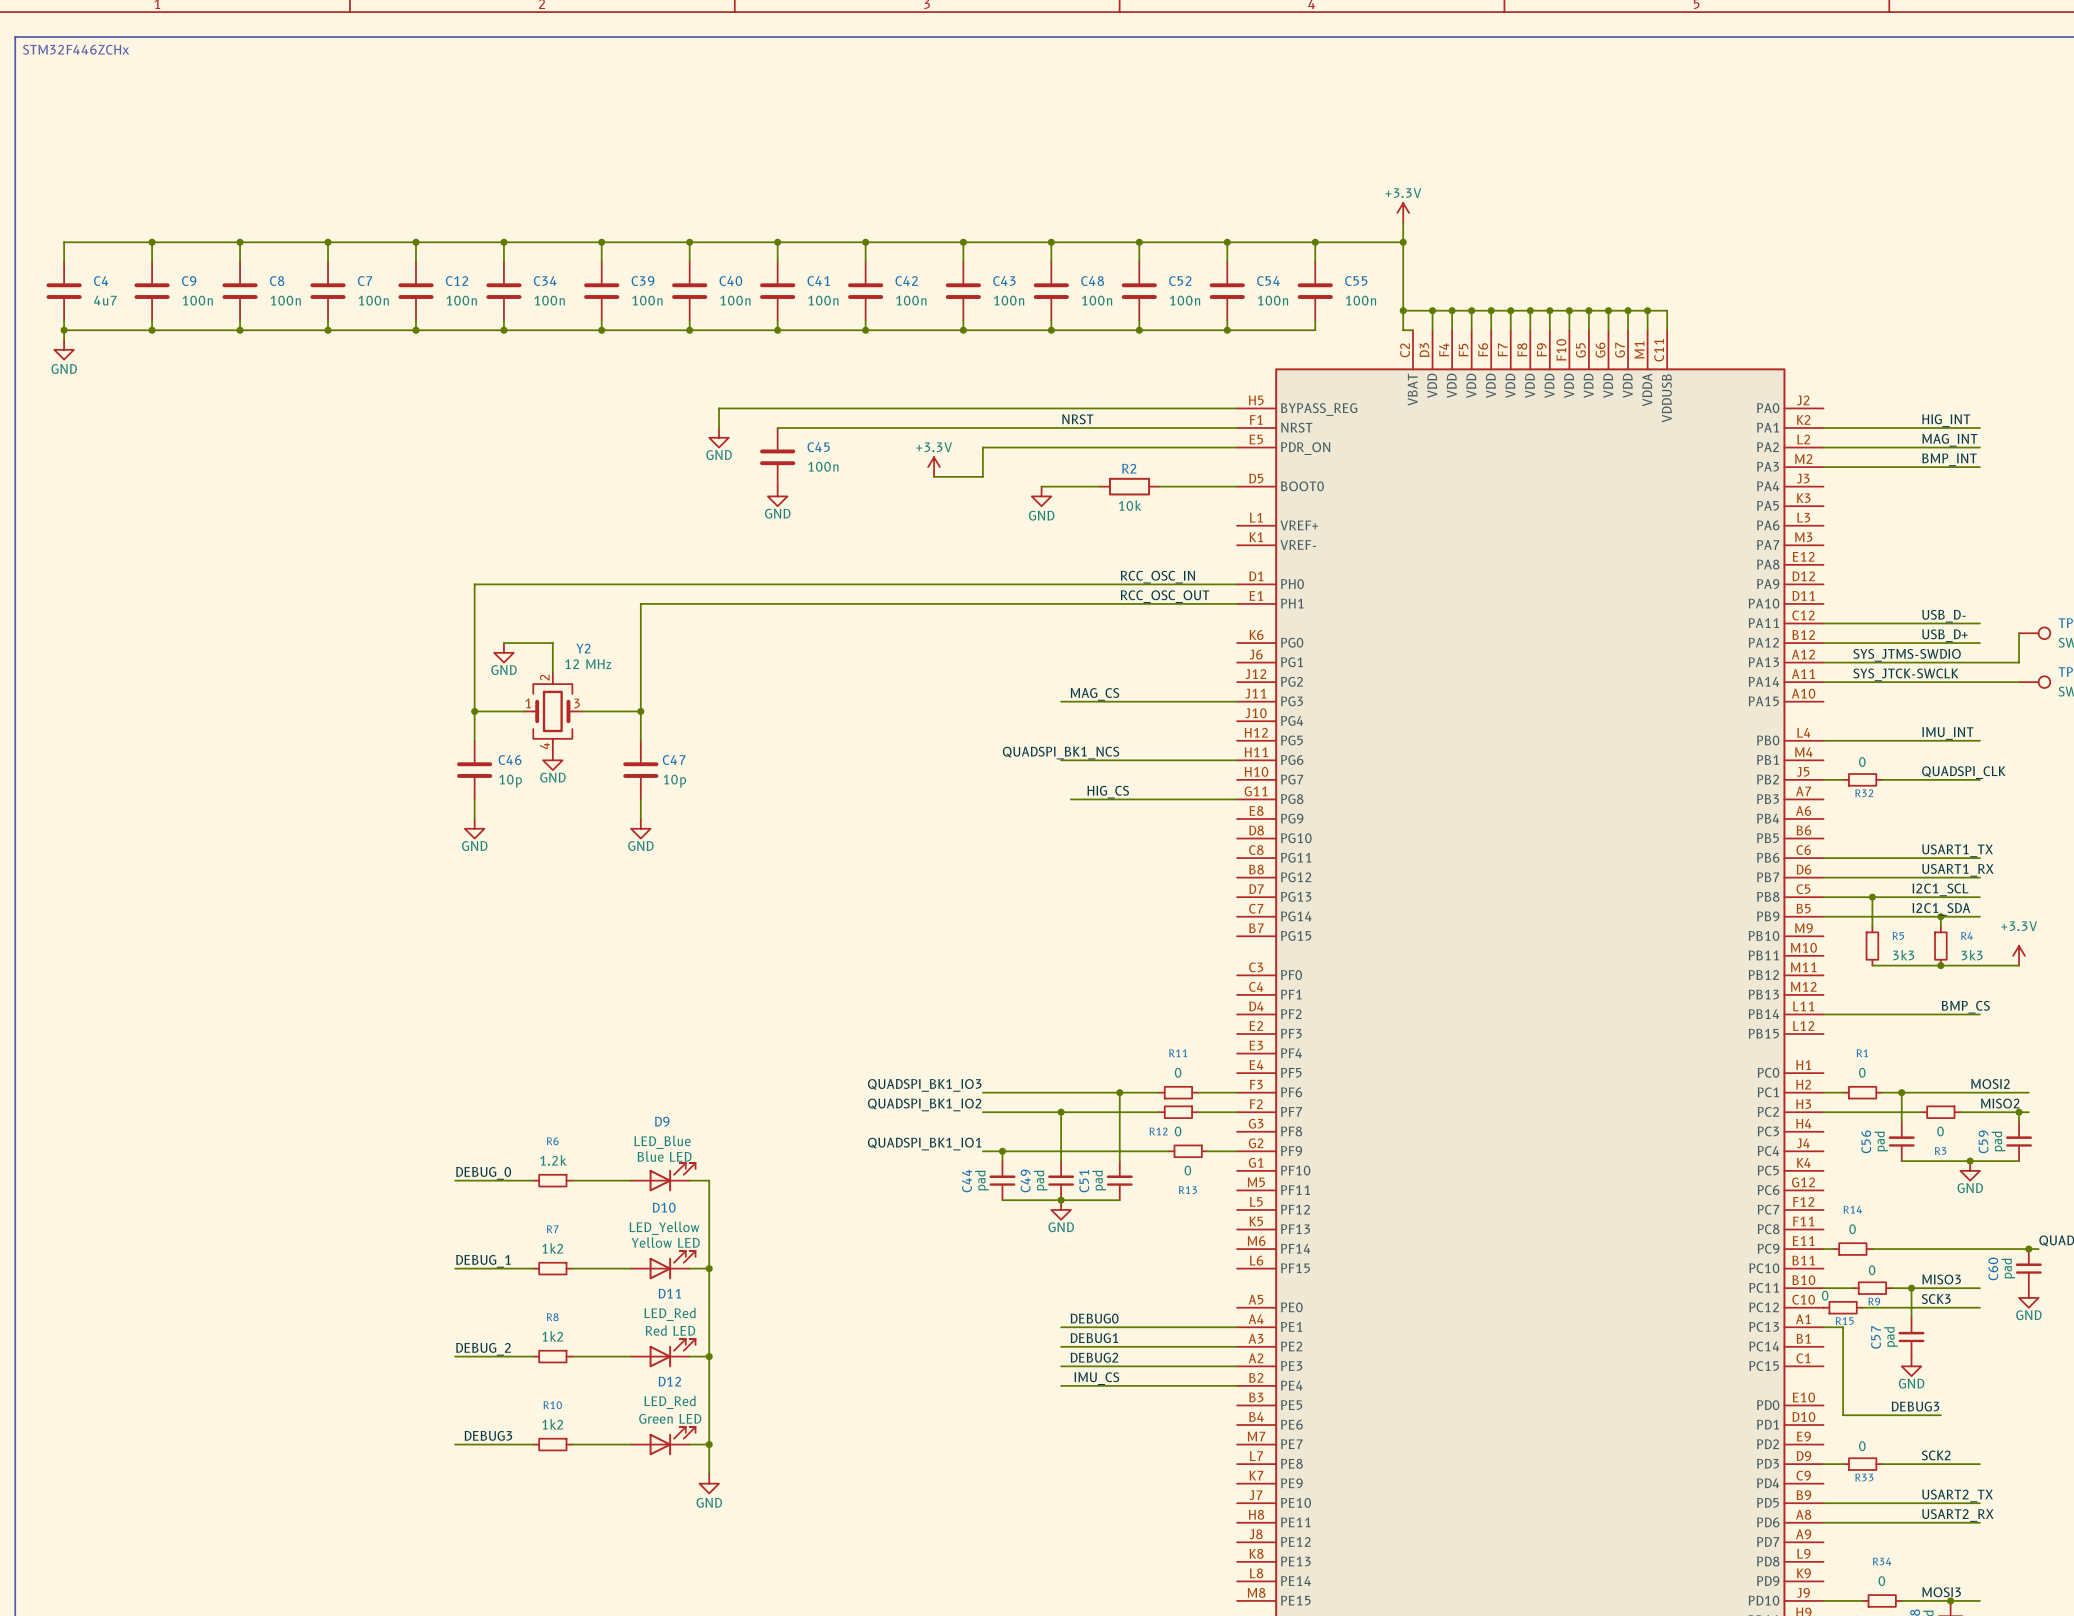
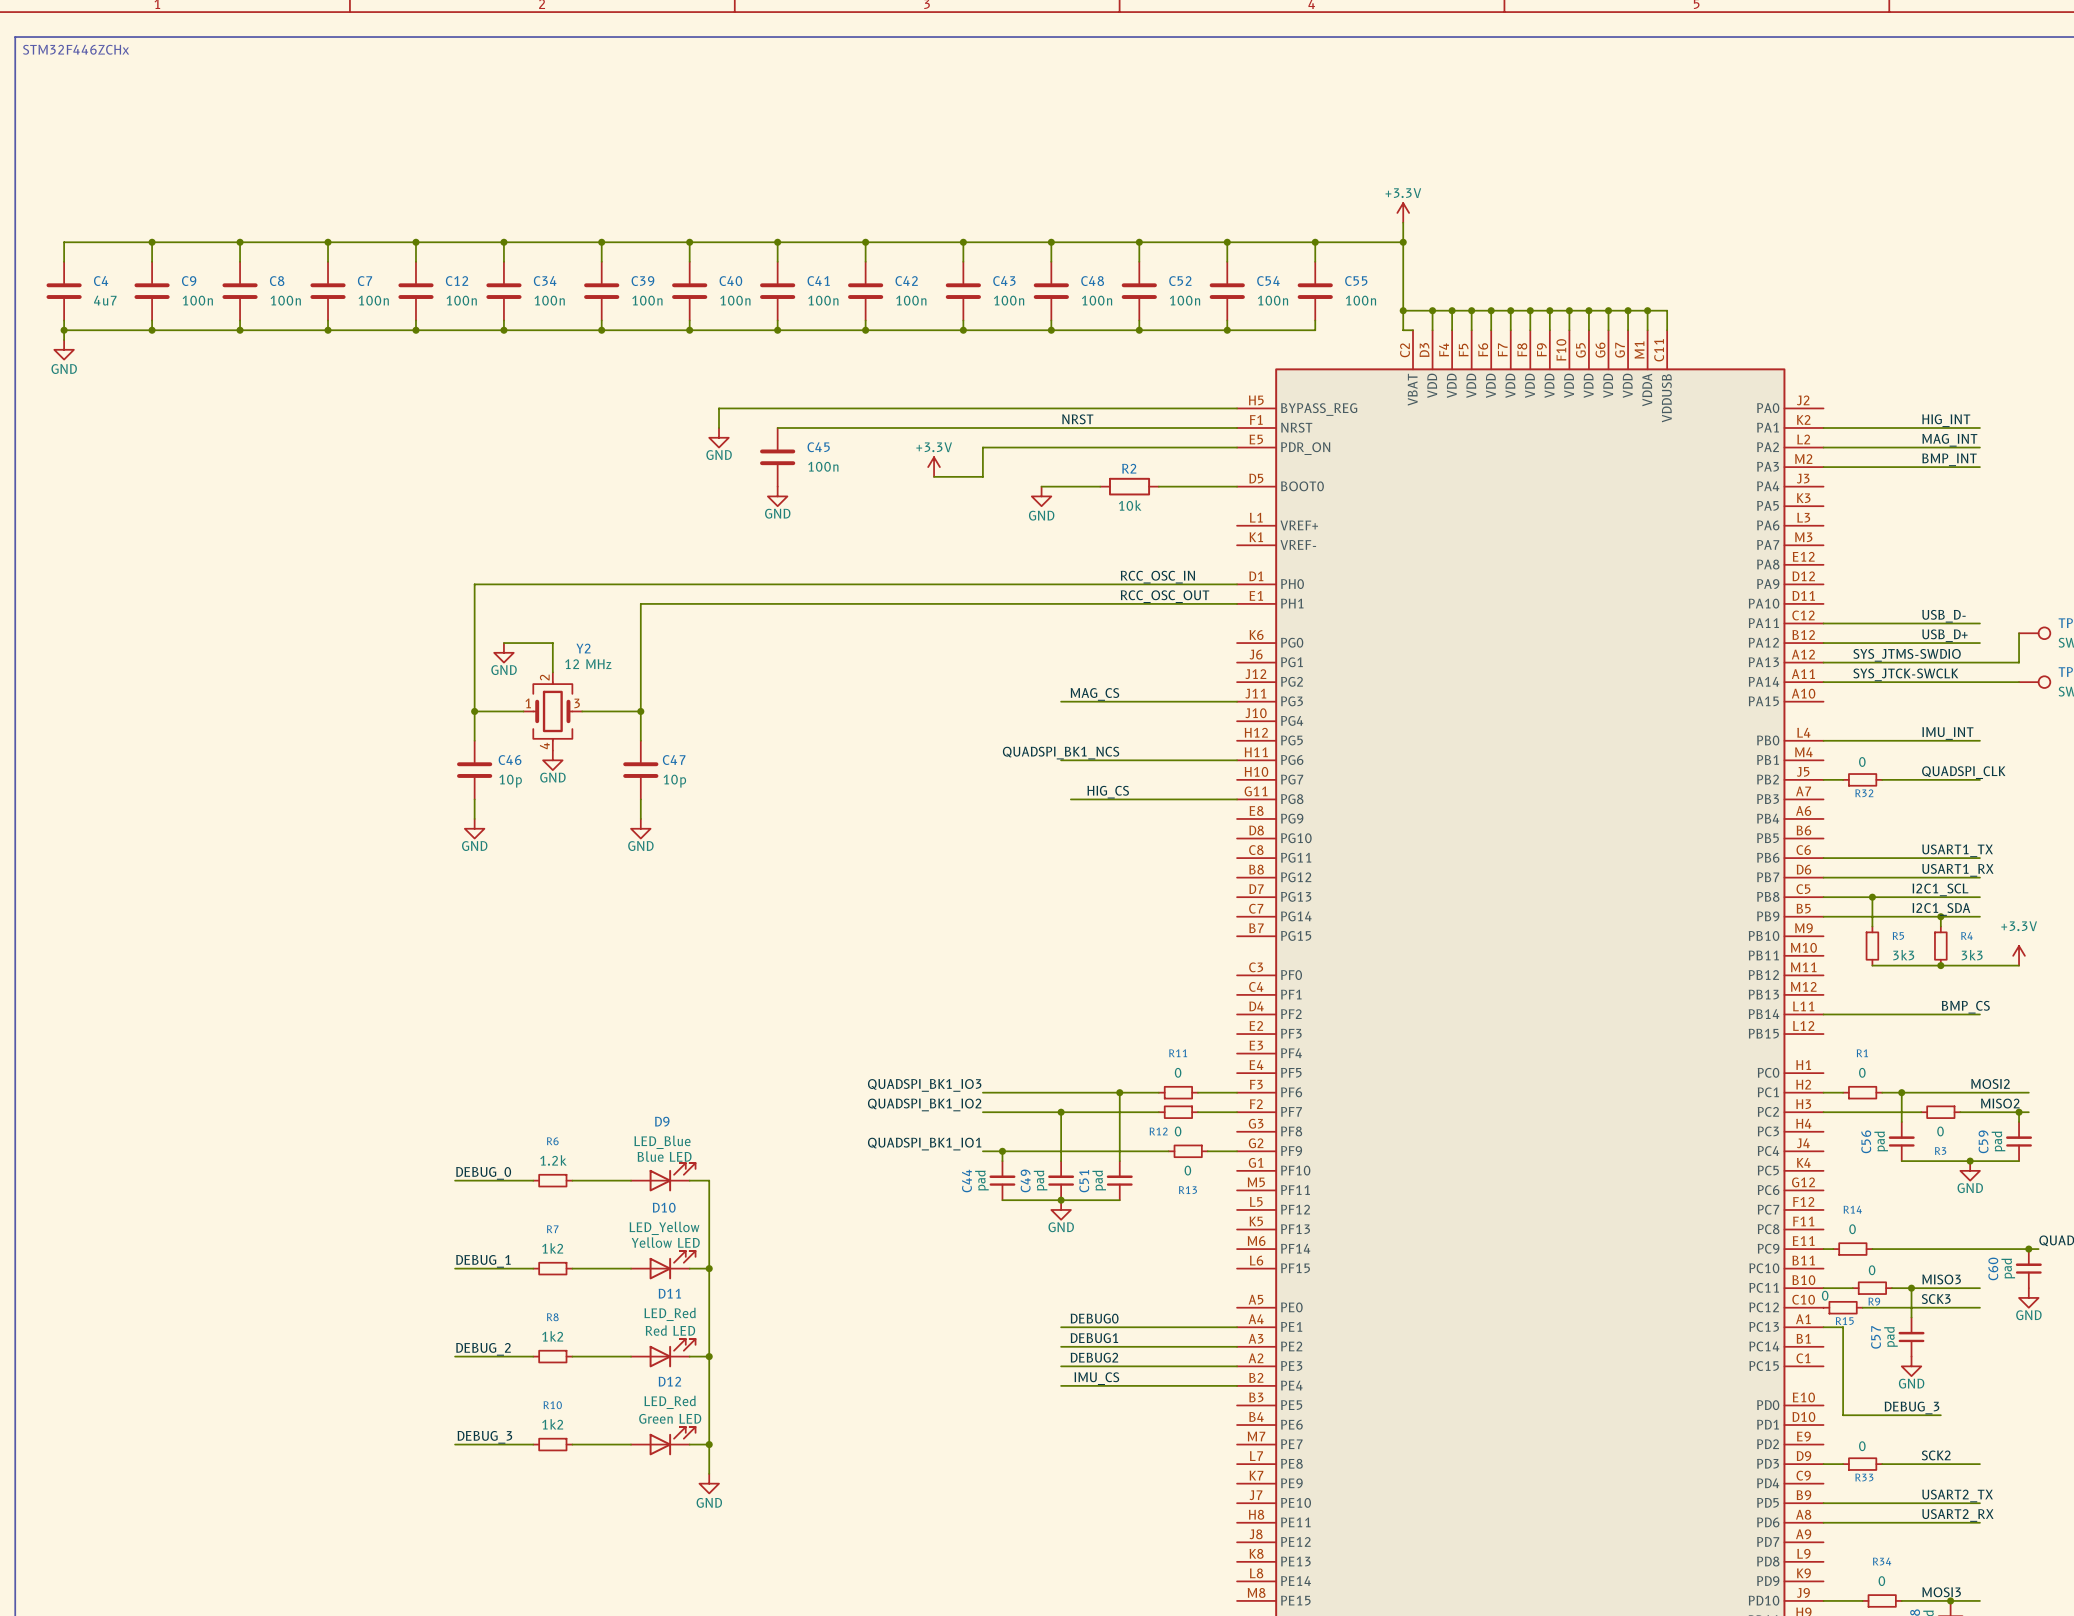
label: DEBUG3 (1915, 1406) -> DEBUG_3 (1911, 1407)
label: DEBUG3 (488, 1435) -> DEBUG_3 (484, 1437)

